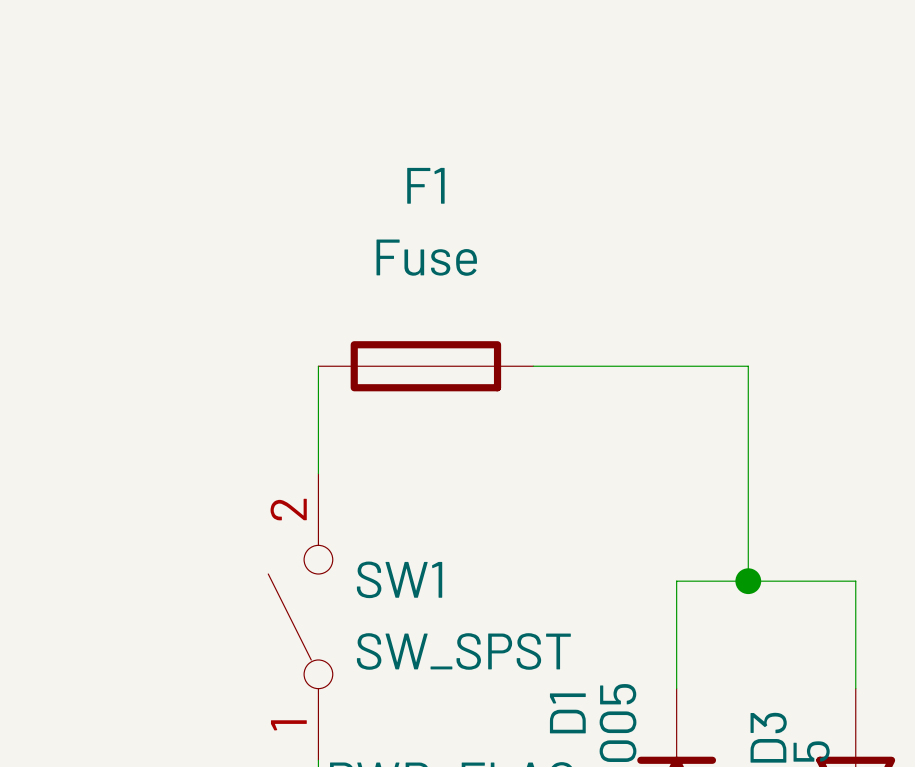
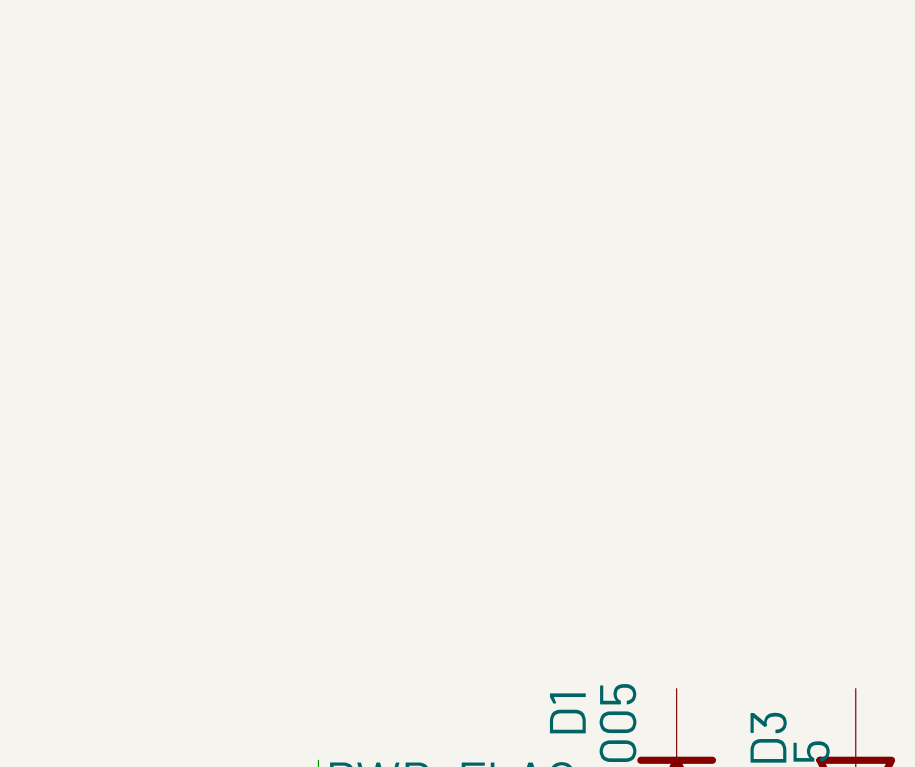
wire: (318, 366) (318, 473) -> none
F1: Fuse (425, 366) -> none
wire: (533, 366) (748, 366) (748, 581) -> none
junction: (748, 581) -> none
SW1: SW_SPST (300, 617) -> none
wire: (676, 688) (676, 581) (855, 581) (855, 688) -> none

